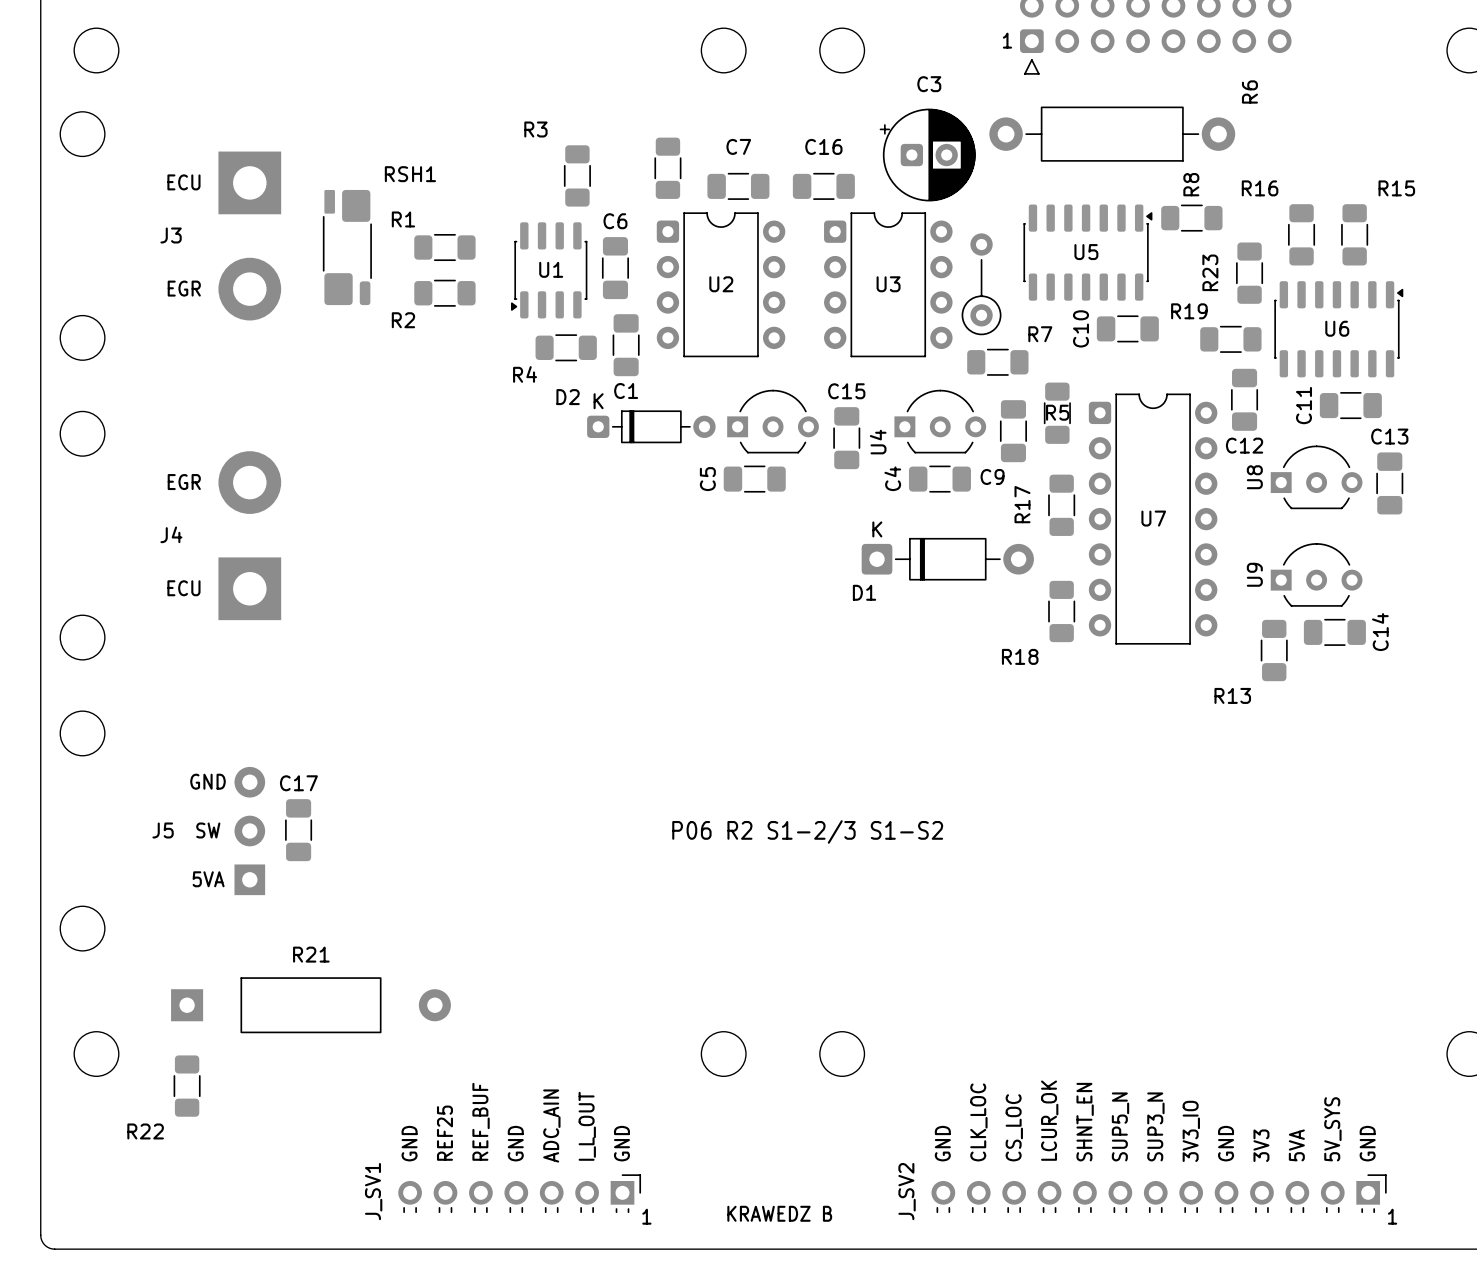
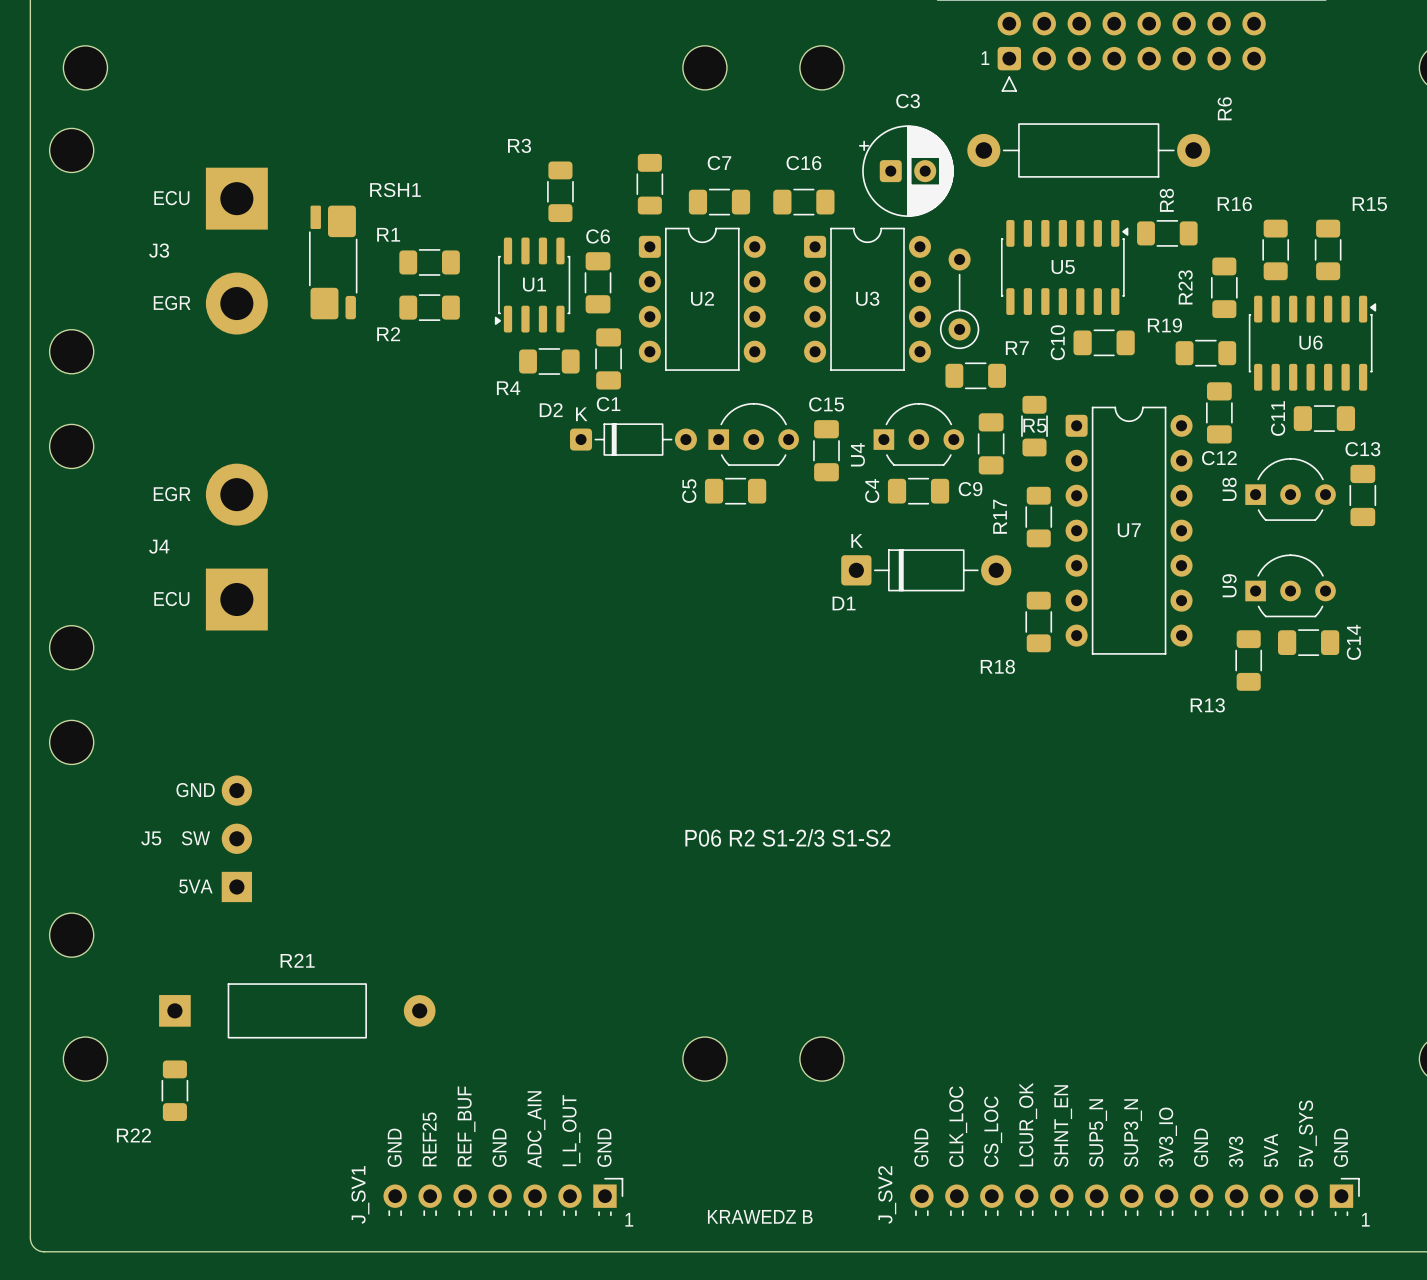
C17: (298, 830) -> none

